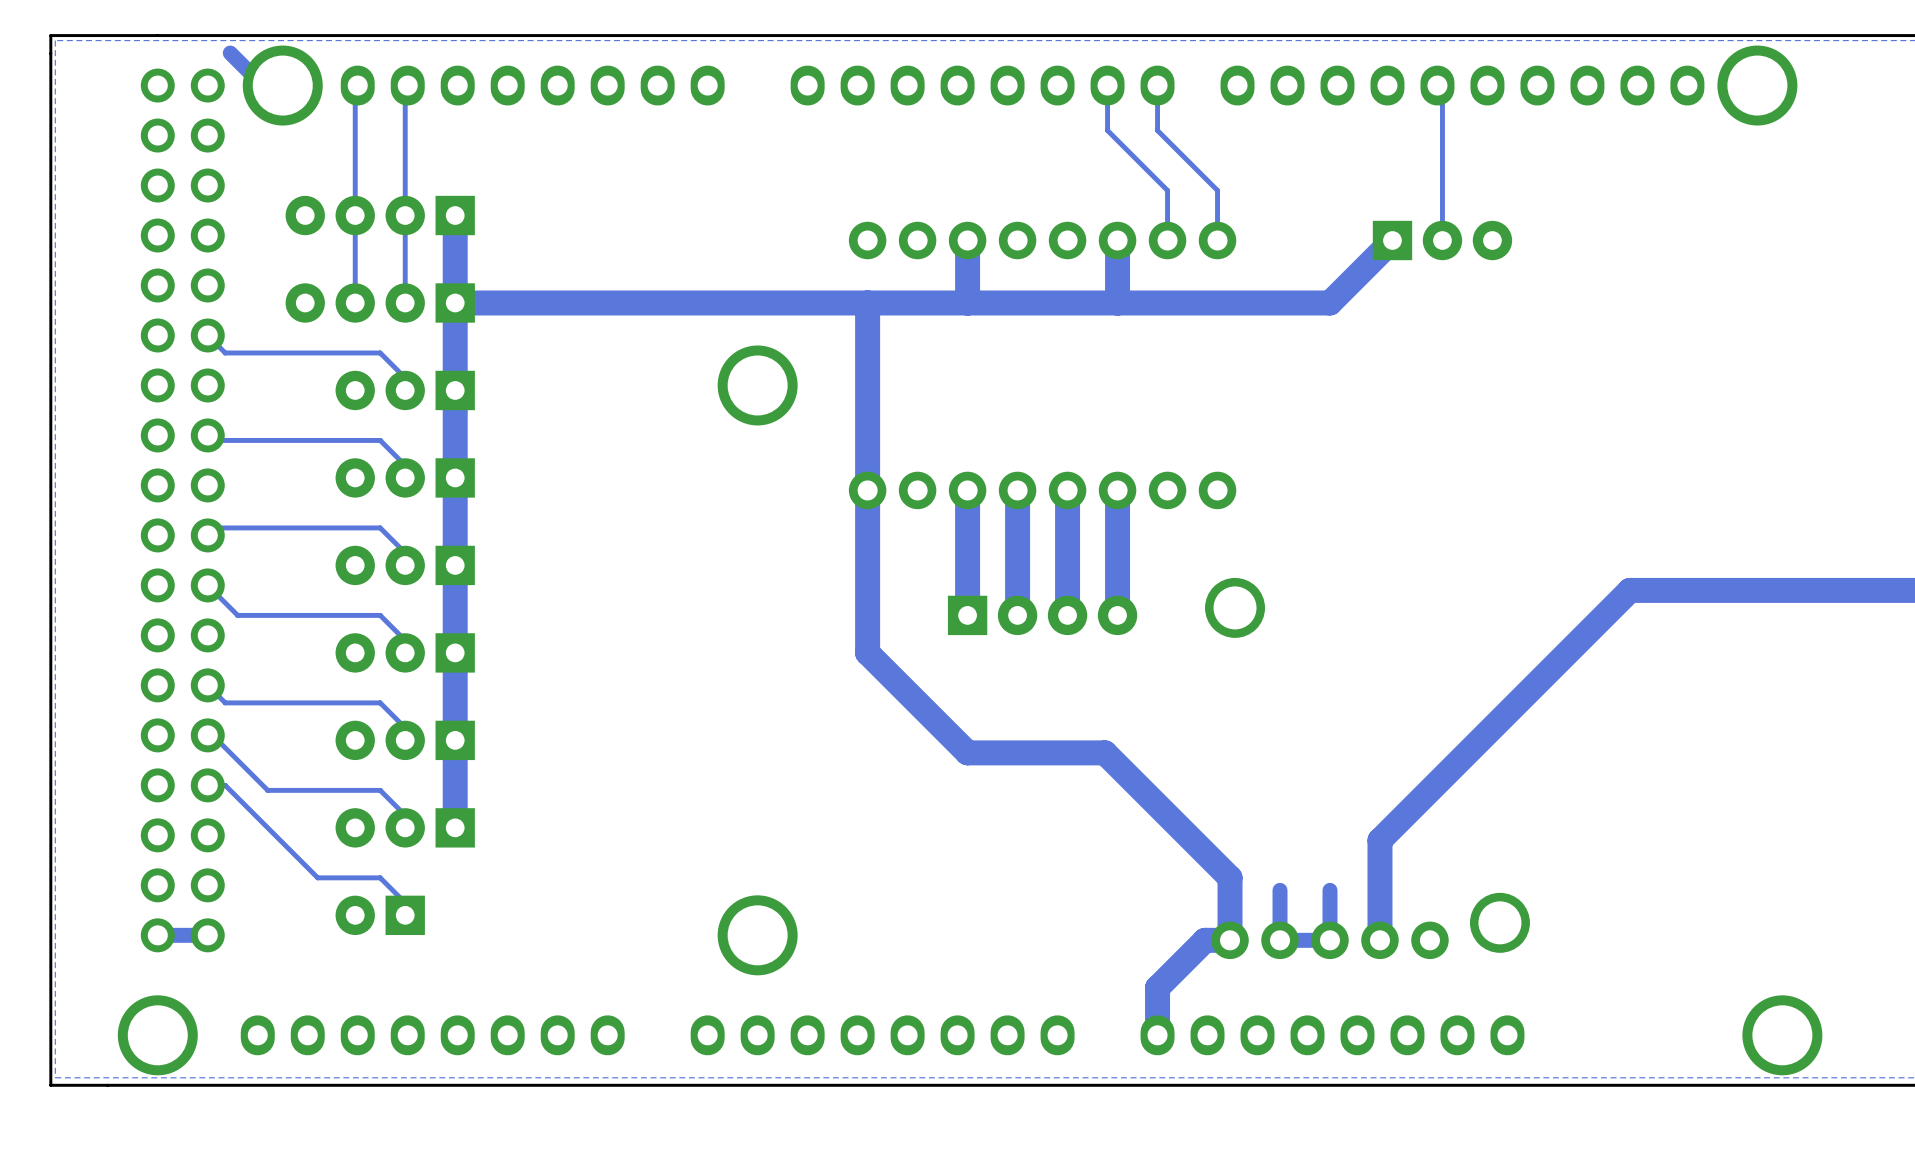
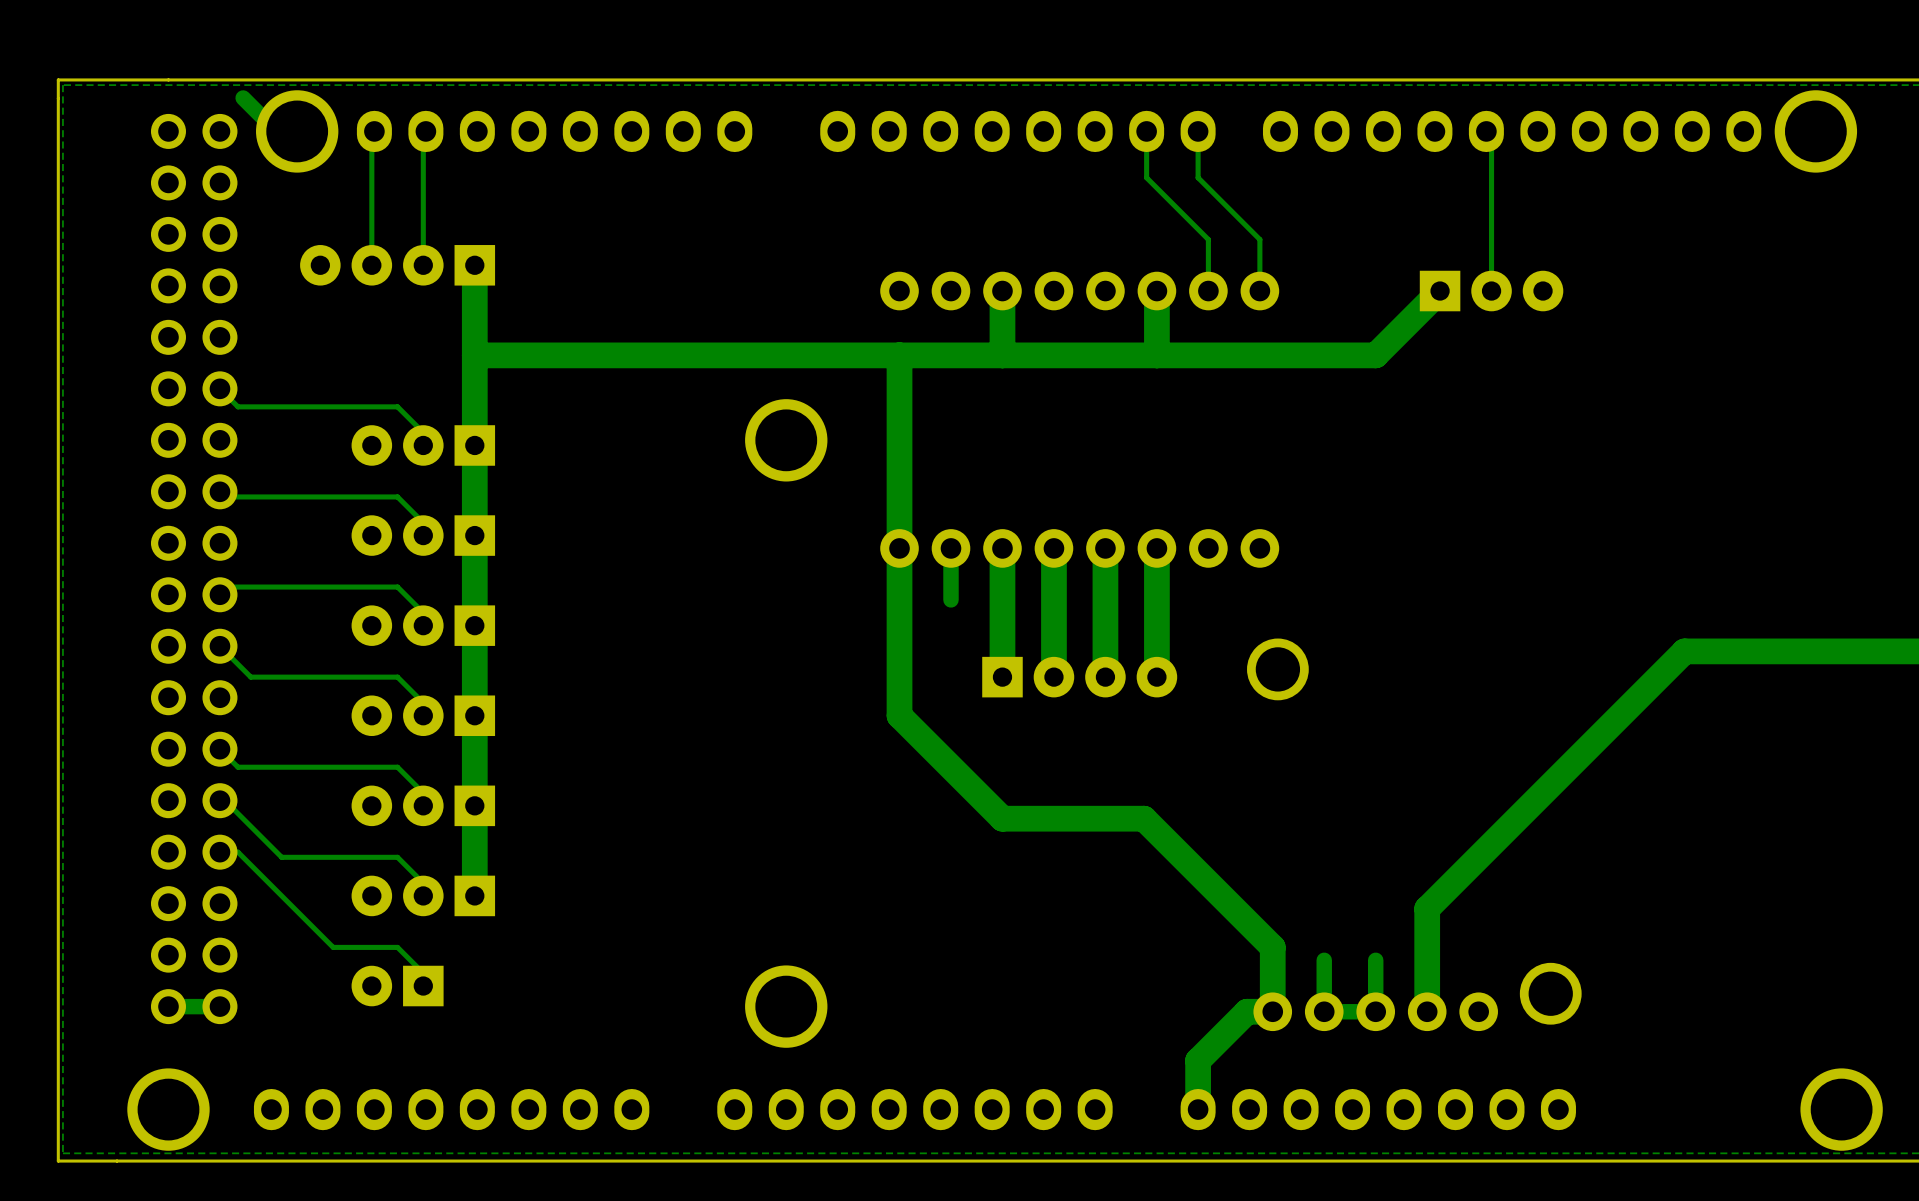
track: (355, 215) (355, 302) -> none
track: (405, 215) (405, 302) -> none
part: (380, 302) -> none
track: none -> (951, 548) (951, 599)

